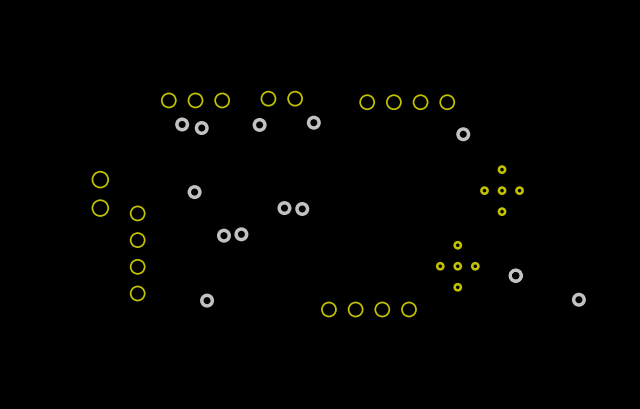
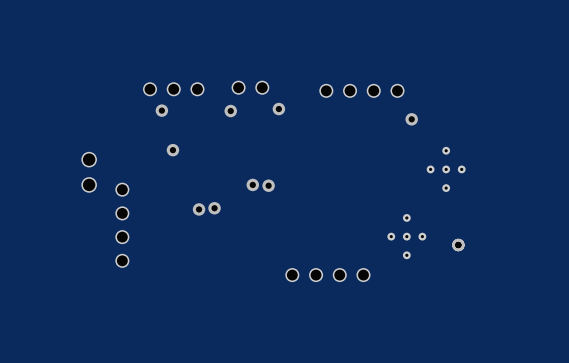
via: (201, 128) -> none
via: none -> (172, 150)
via: (194, 192) -> none
via: (578, 299) -> none
via: (207, 300) -> none

